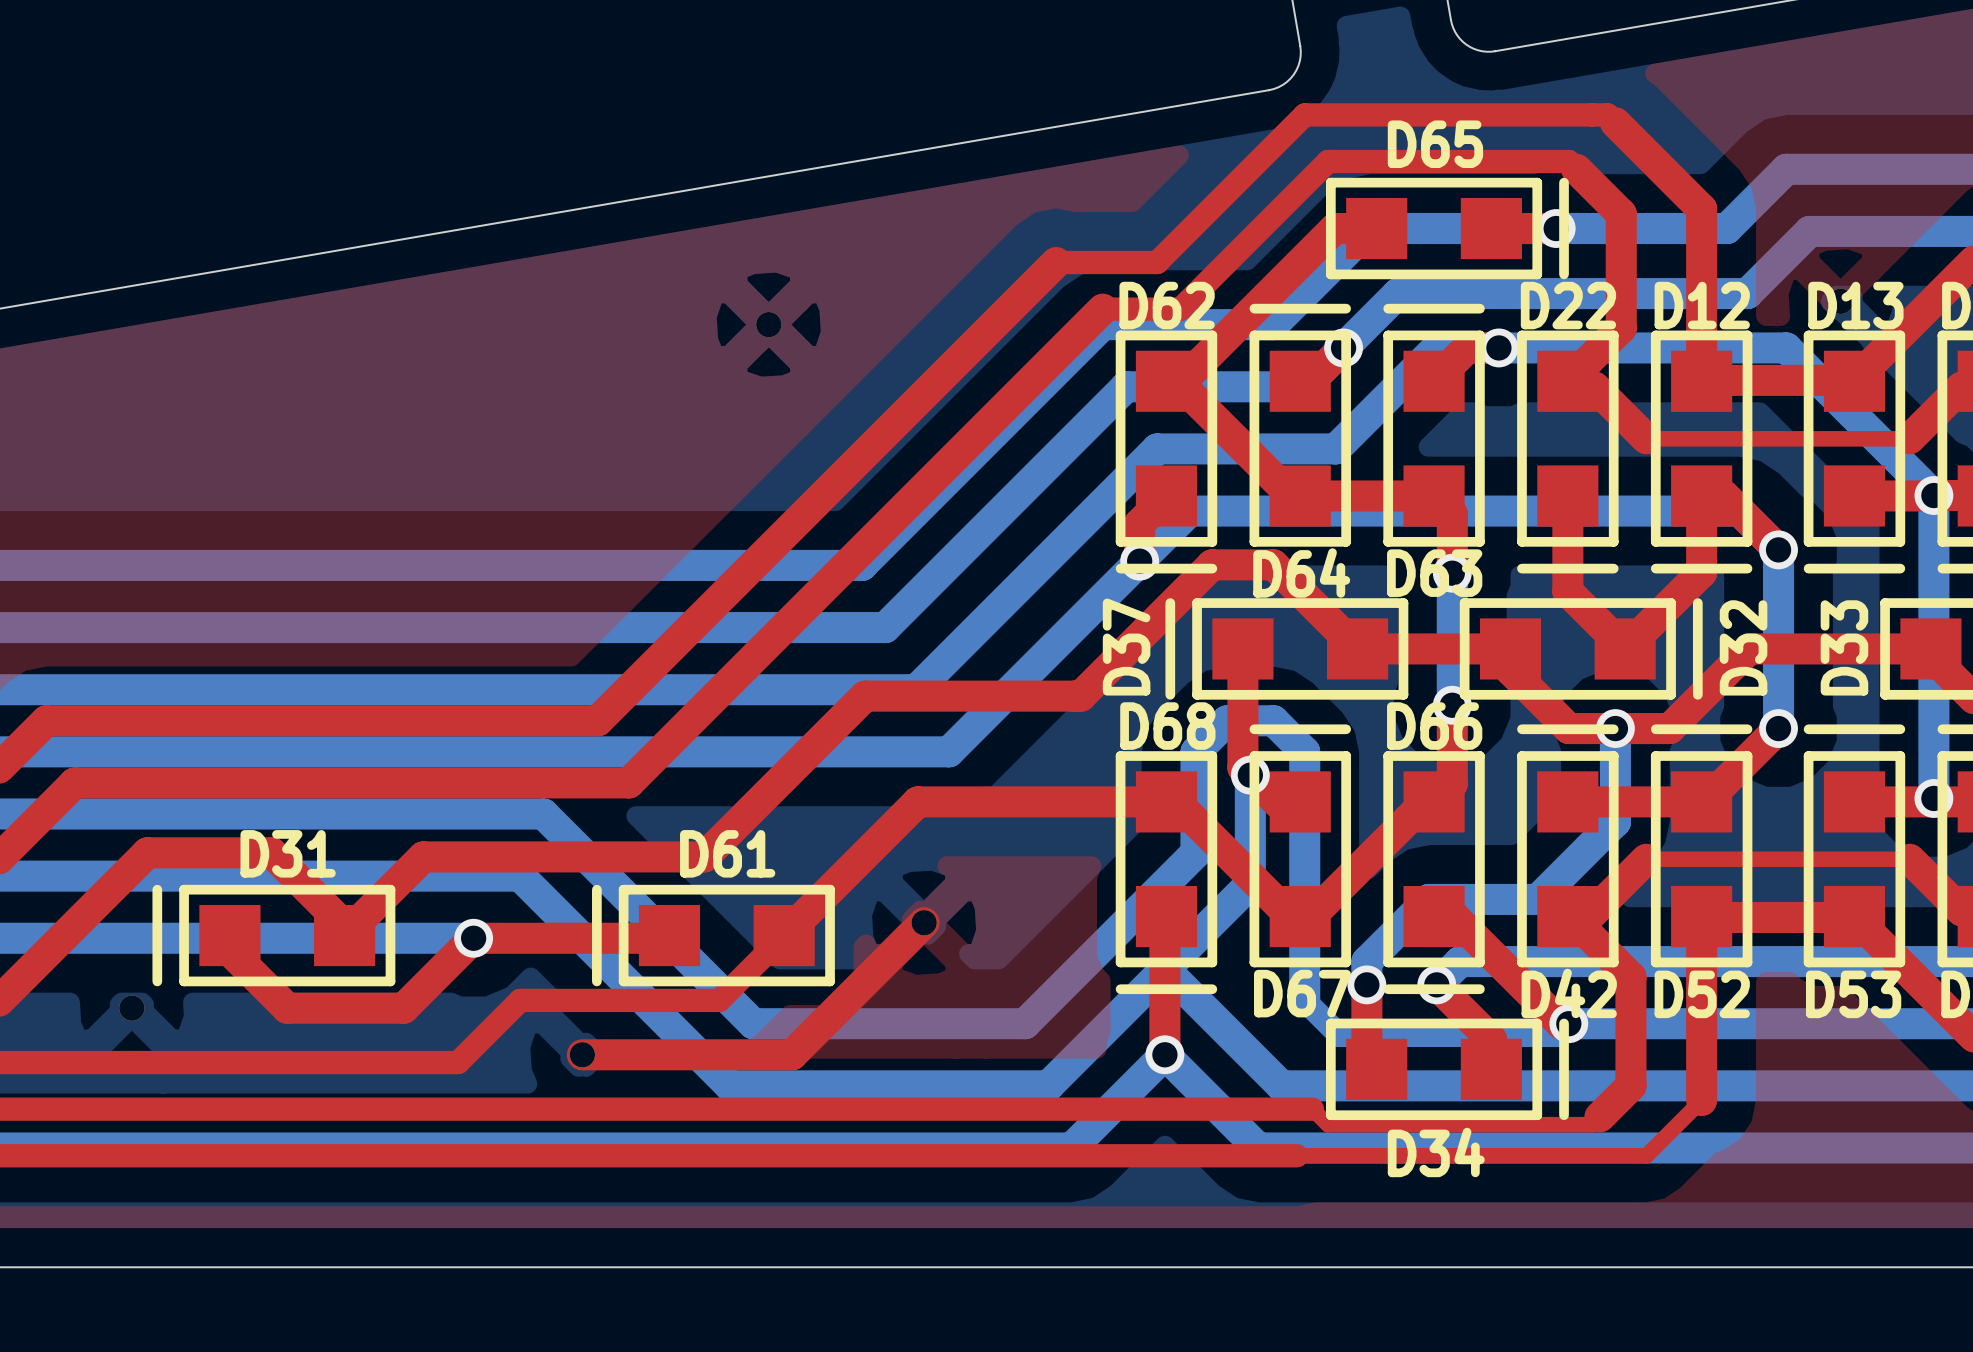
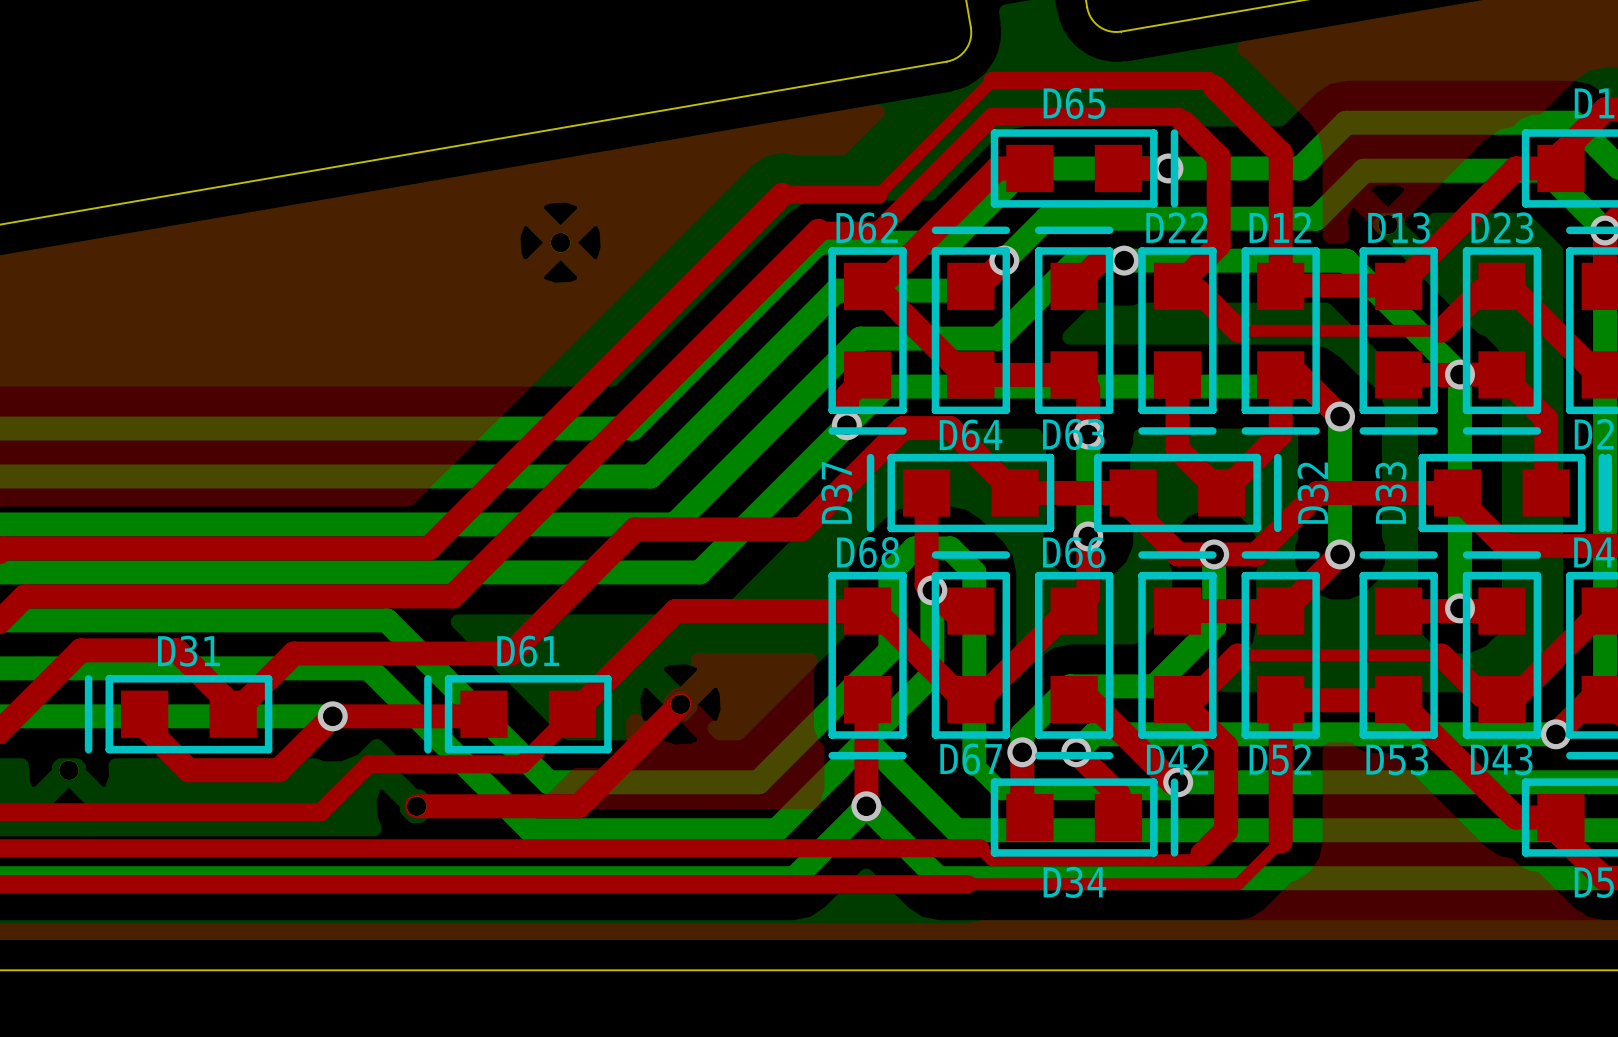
top track: (1328, 114) (1304, 114) (1157, 262) -> (992, 80) (878, 194) (860, 194)

